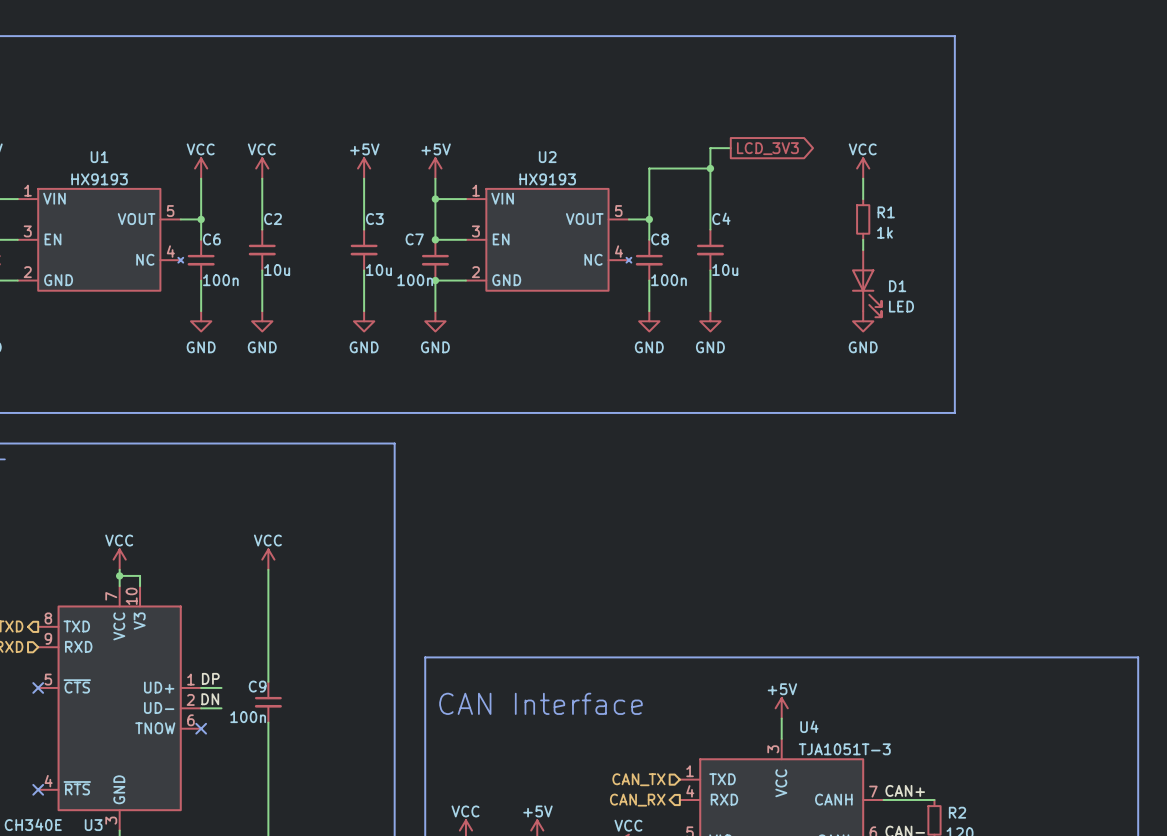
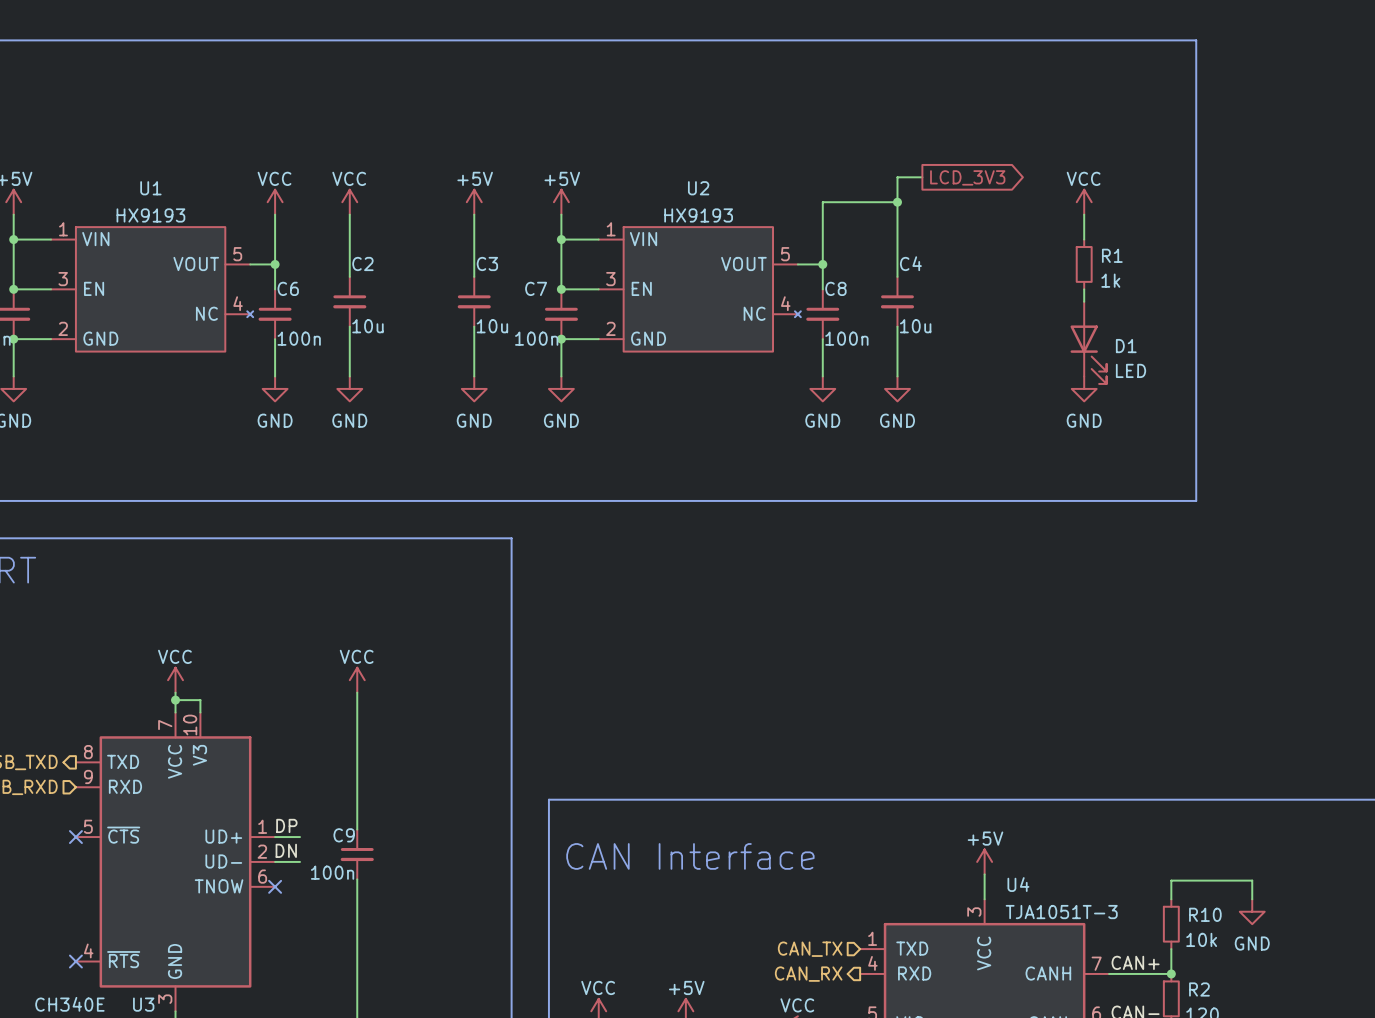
wire: none -> (1171, 899) (1171, 880) (1252, 880) (1252, 899)
power symbol: none -> GND (1252, 911)
R10: none -> 10k (1171, 924)
wire: none -> (1171, 949) (1171, 973)
junction: none -> (1171, 973)

